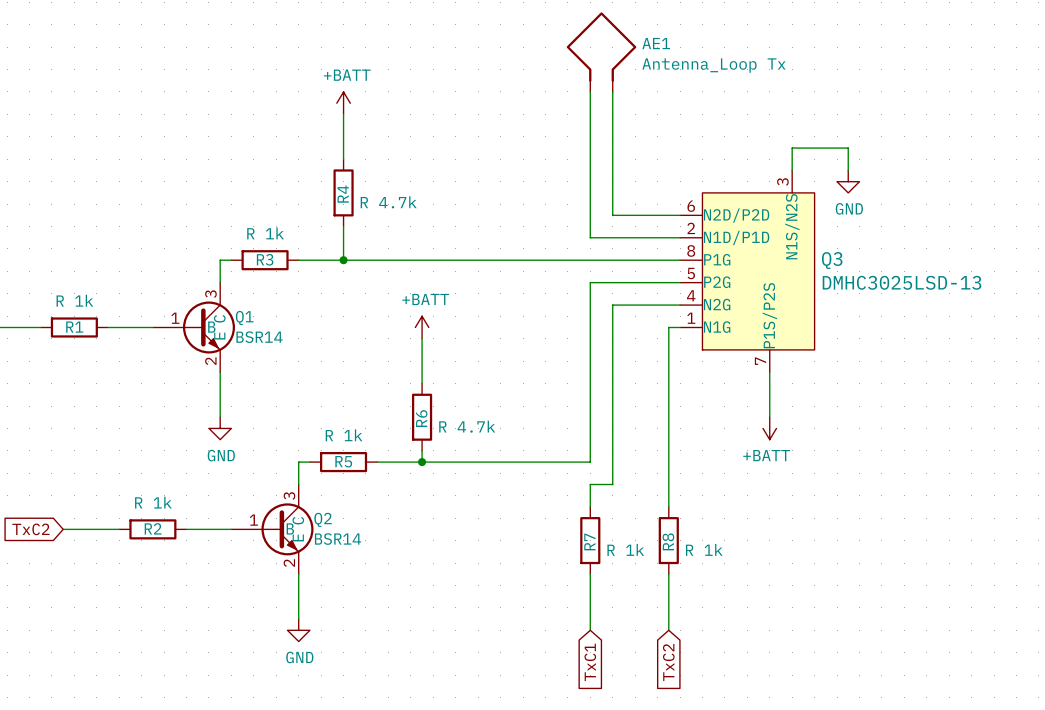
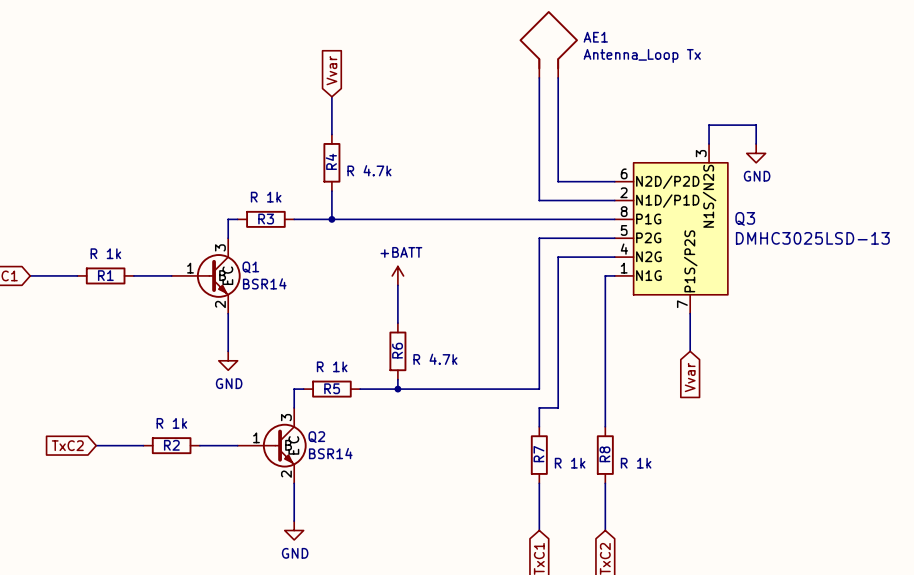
global label: none -> Vvar (331, 70)
power symbol: +BATT (343, 103) -> none
power symbol: +BATT (769, 428) -> none
global label: none -> Vvar (690, 377)

